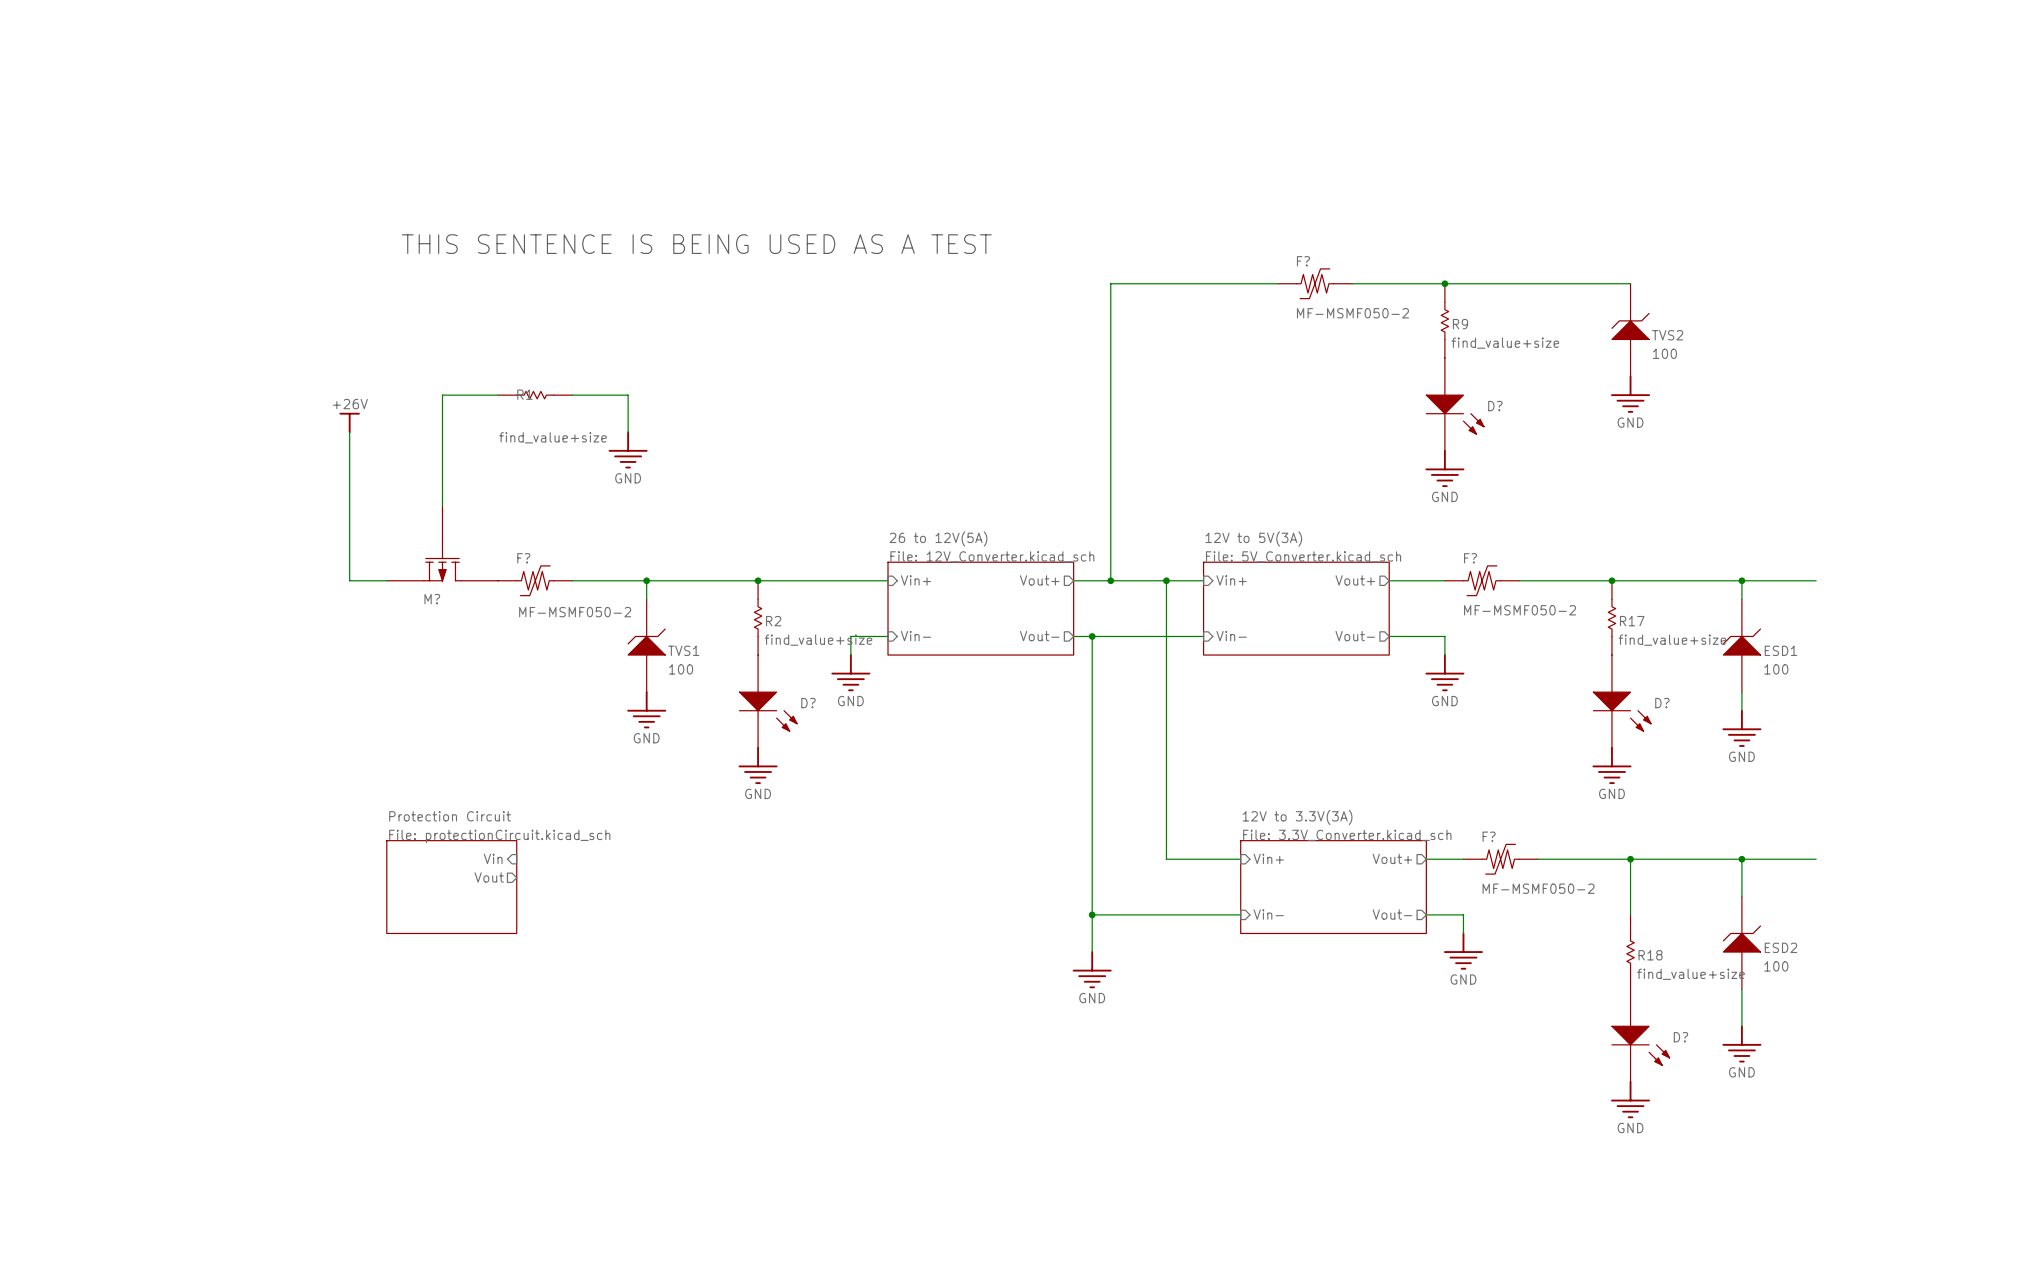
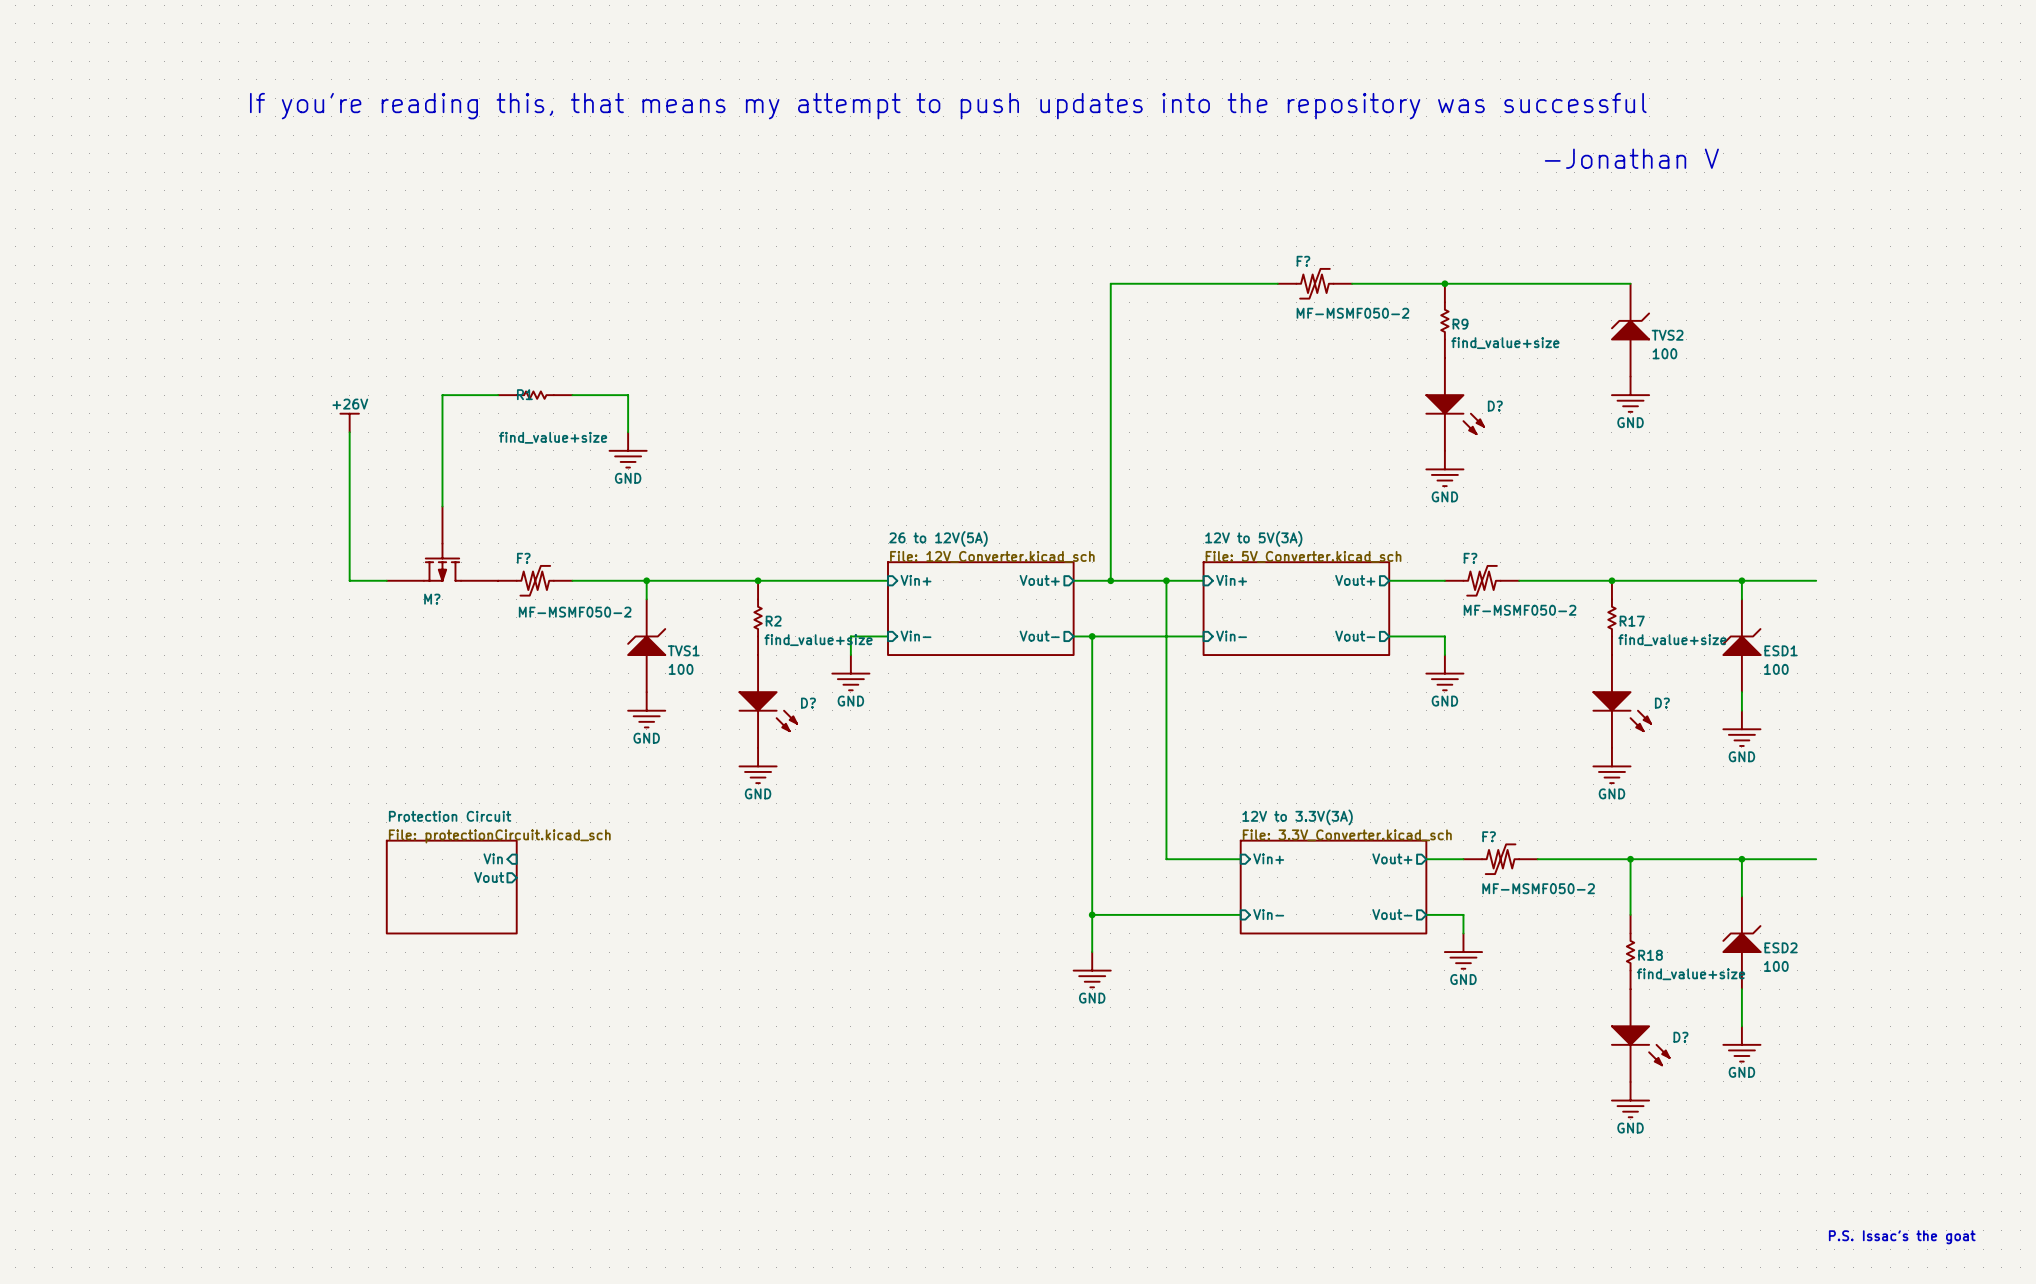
text: none -> If you're reading this, that means my attempt to push updates into the repository was successful (948, 106)
text: none -> -Jonathan V (1631, 158)
text: THIS SENTENCE IS BEING USED AS A TEST (696, 244) -> none
text: none -> P.S. Issac's the goat (1902, 1237)

